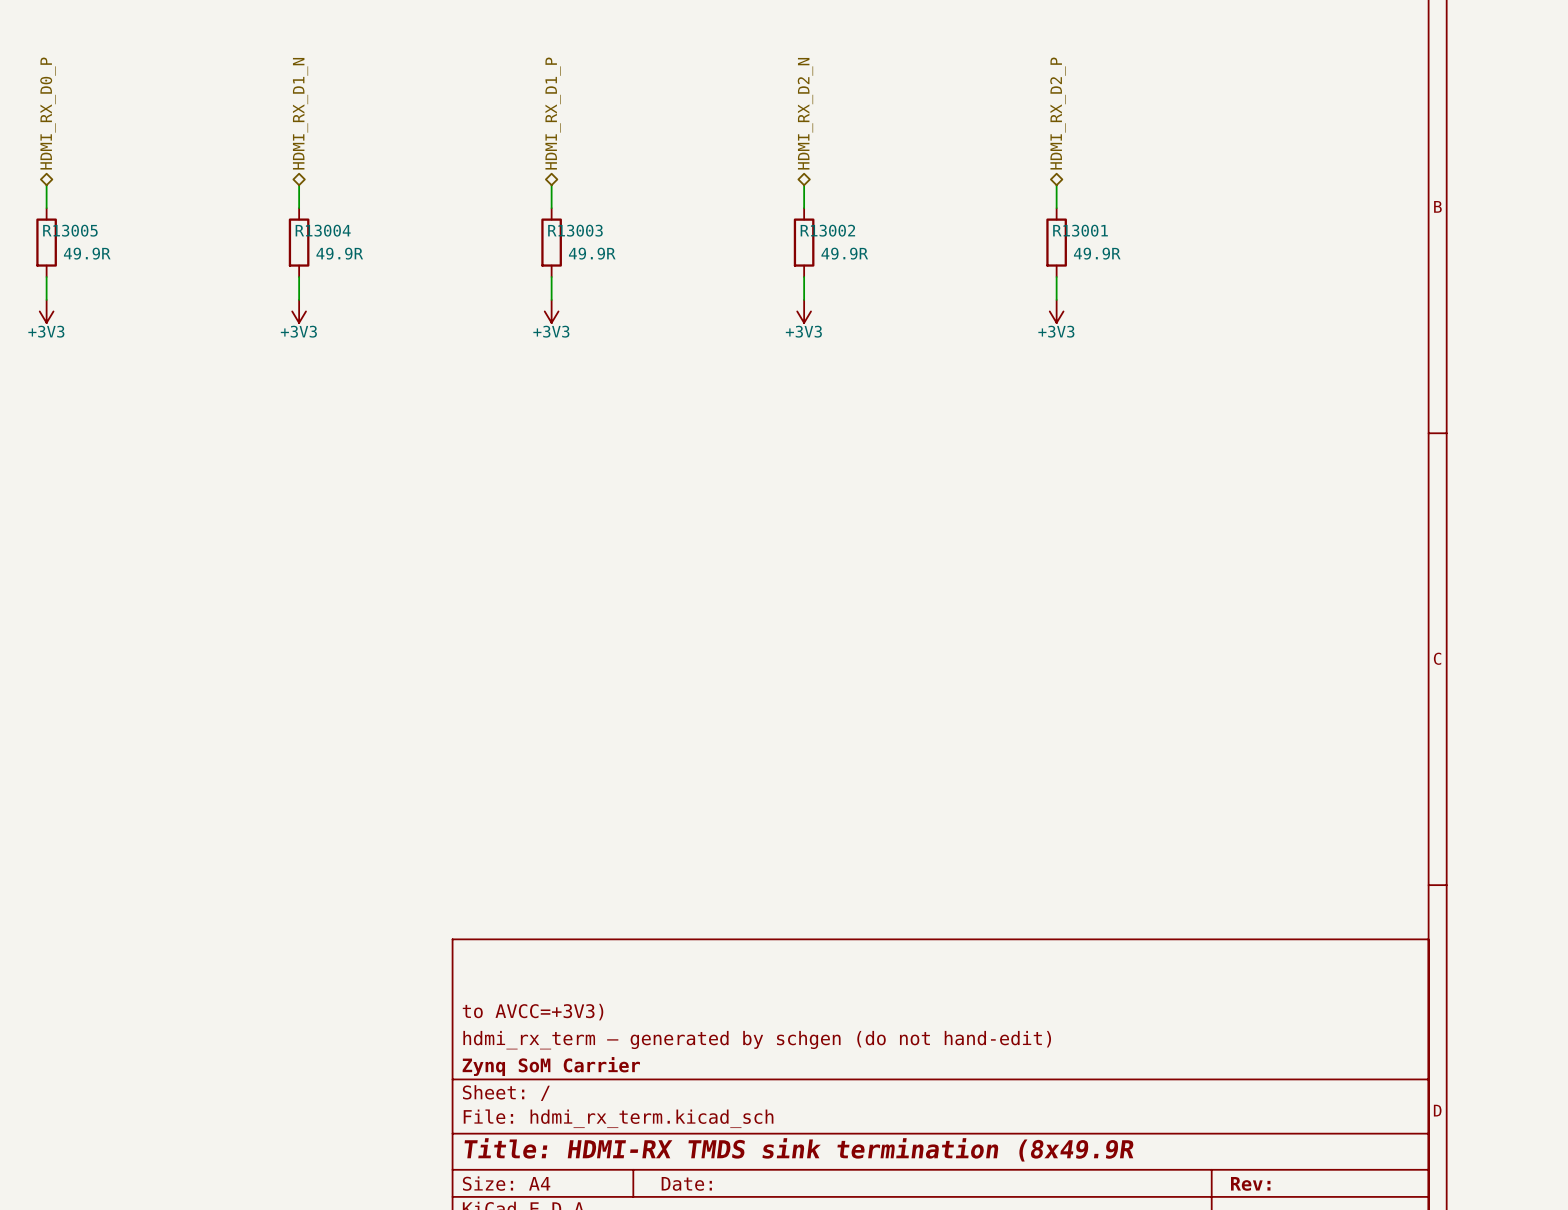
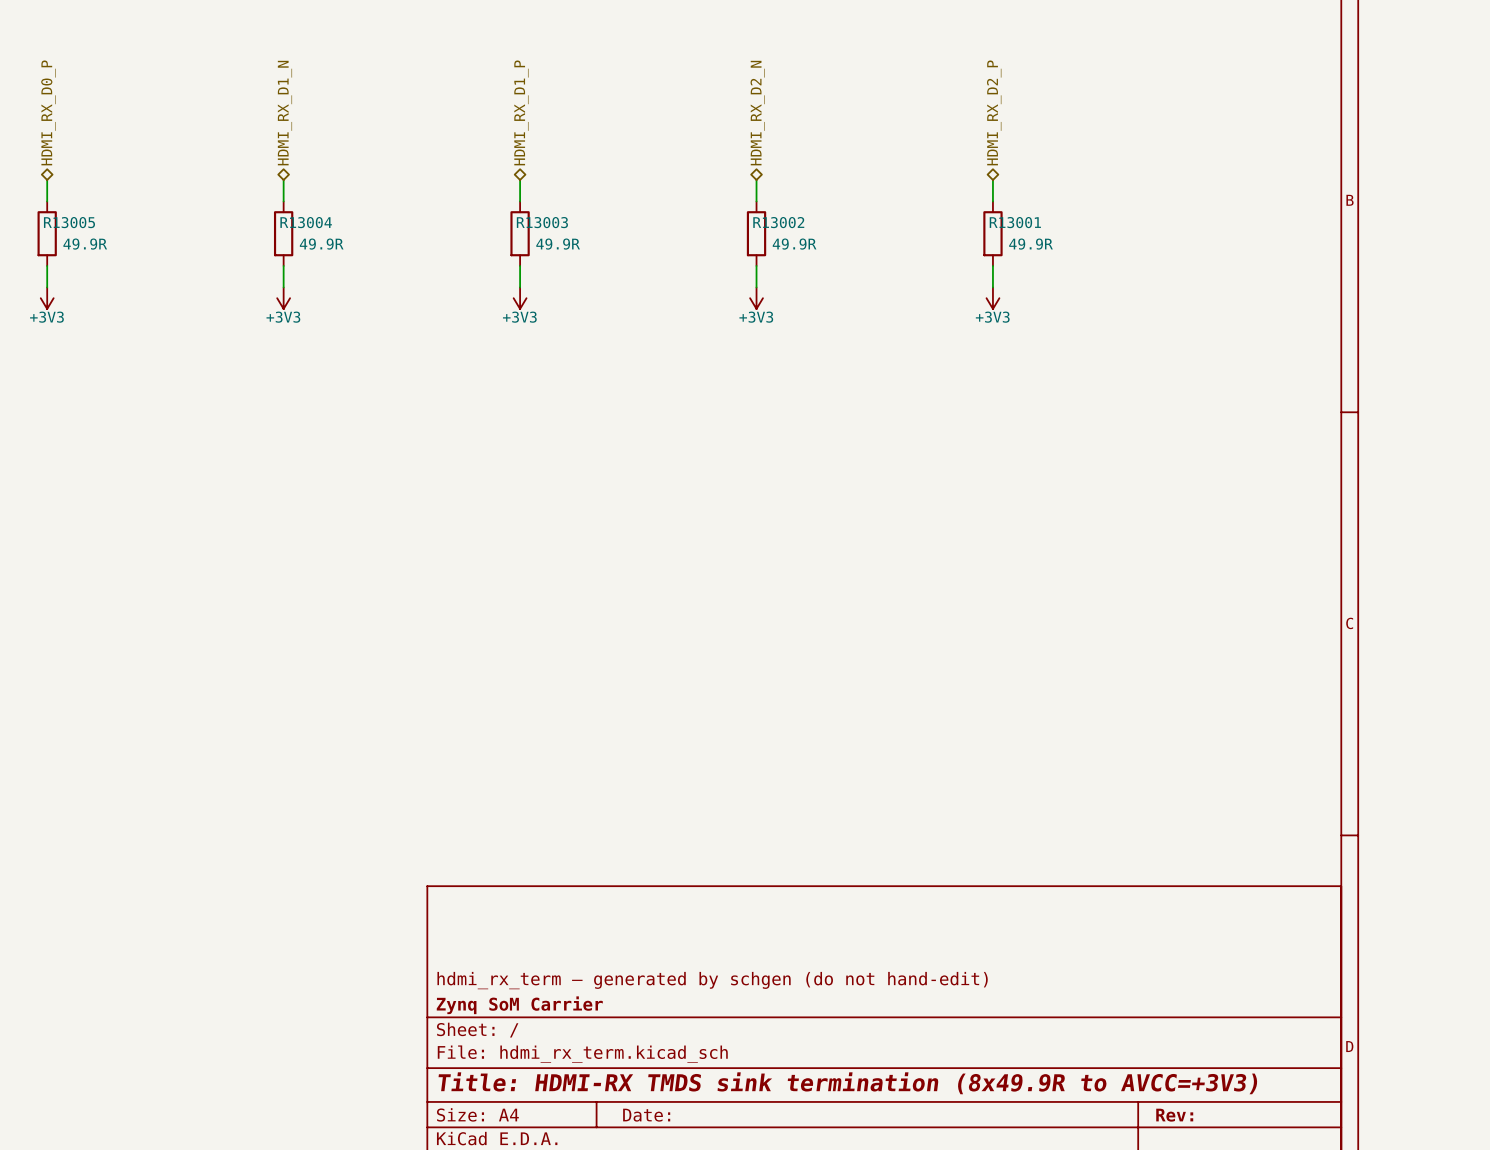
title block: to AVCC=+3V3) (533, 1012) -> none
title block: Title: HDMI-RX TMDS sink termination (8x49.9R (799, 1149) -> Title: HDMI-RX TMDS sink termination (8x49.9R to AVCC=+3V3) (847, 1083)

